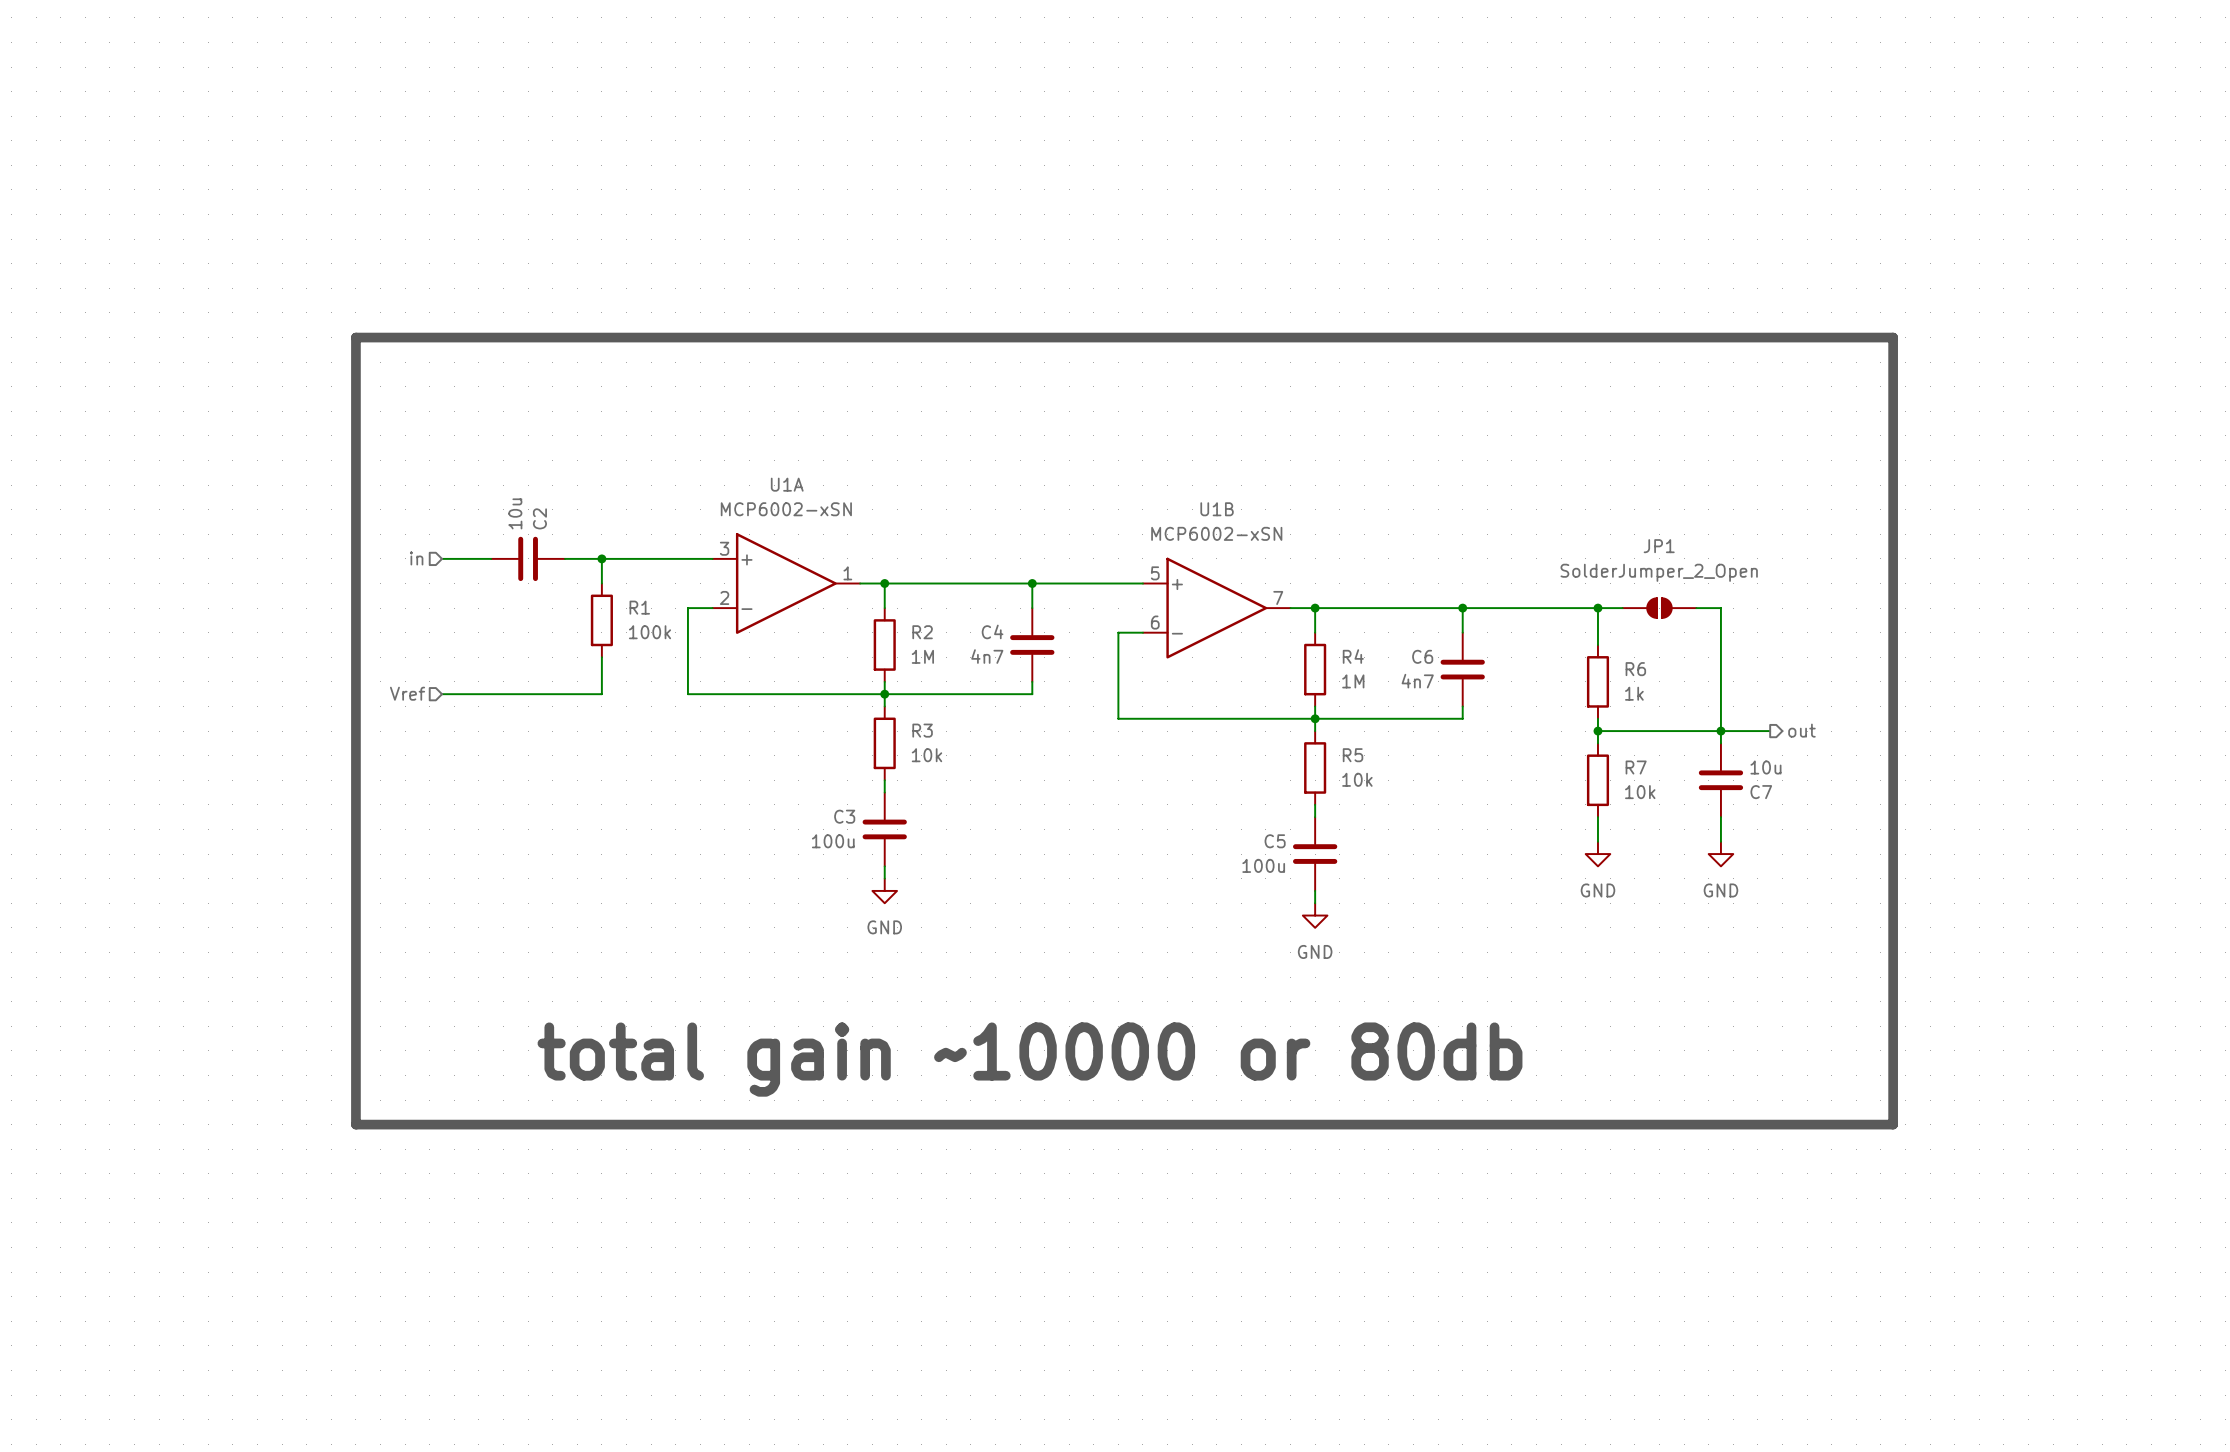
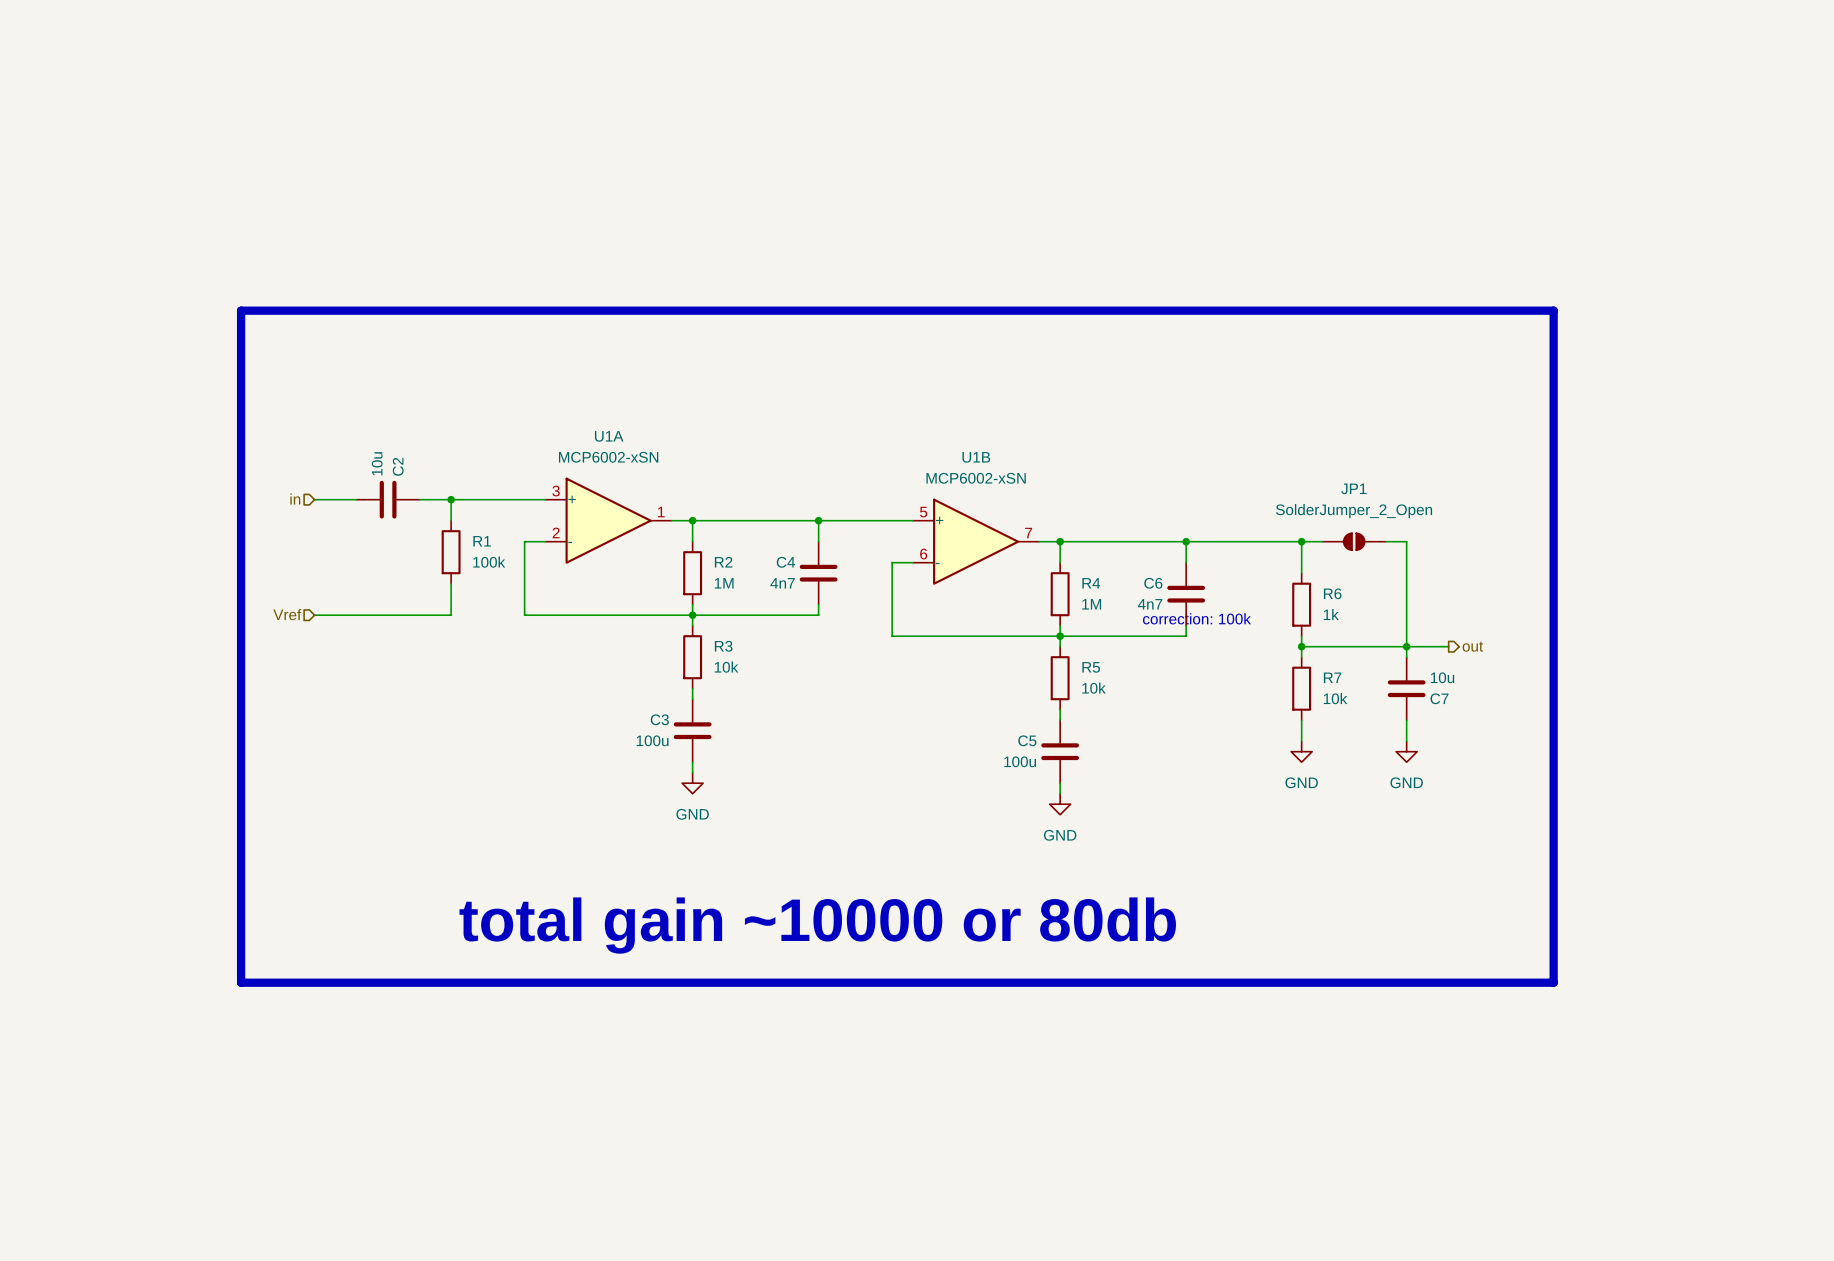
text: none -> correction: 100k (1196, 618)

